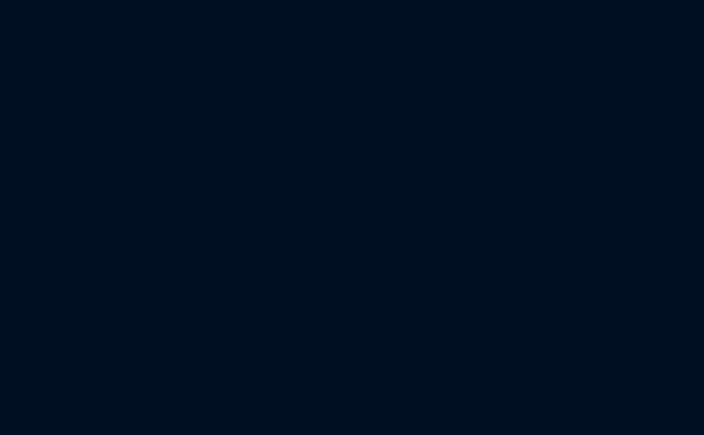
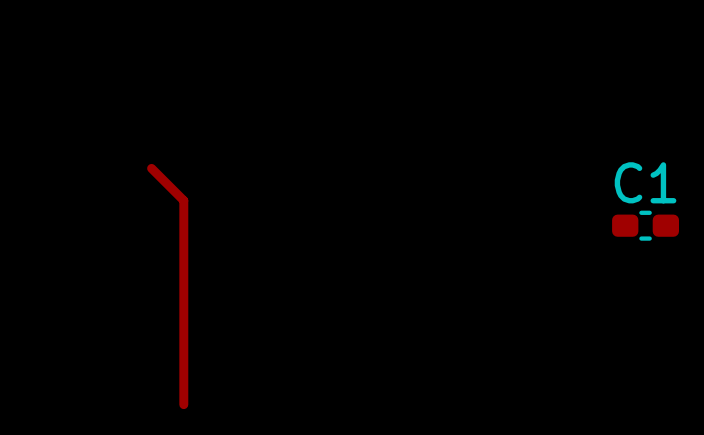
track: none -> (151, 168) (183, 200) (183, 404)
C1: none -> (645, 225)

